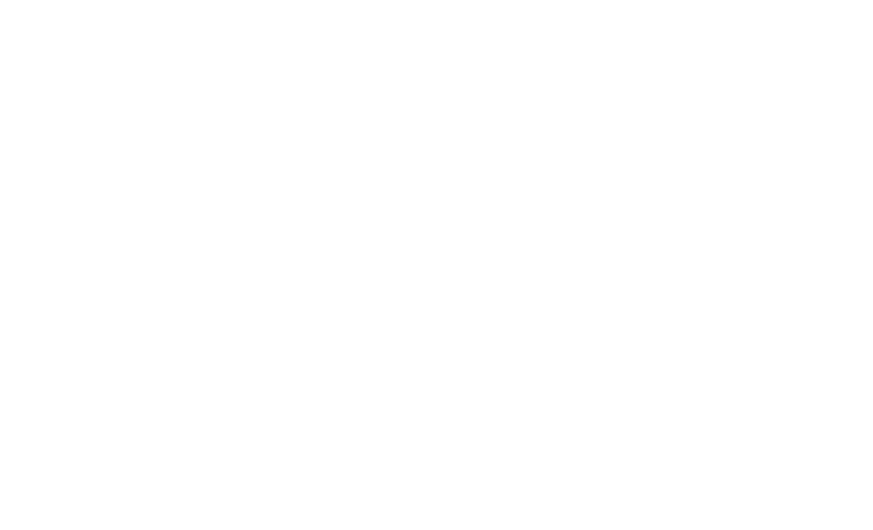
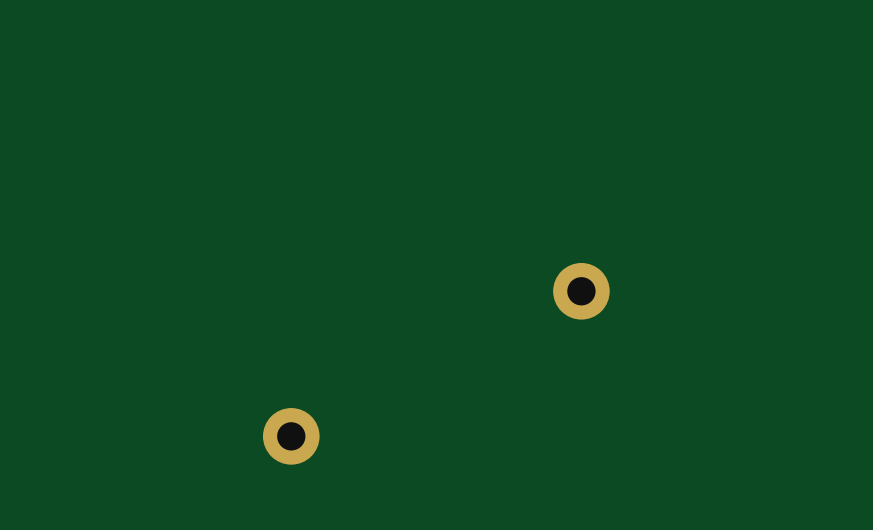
via: none -> (581, 291)
via: none -> (291, 436)

